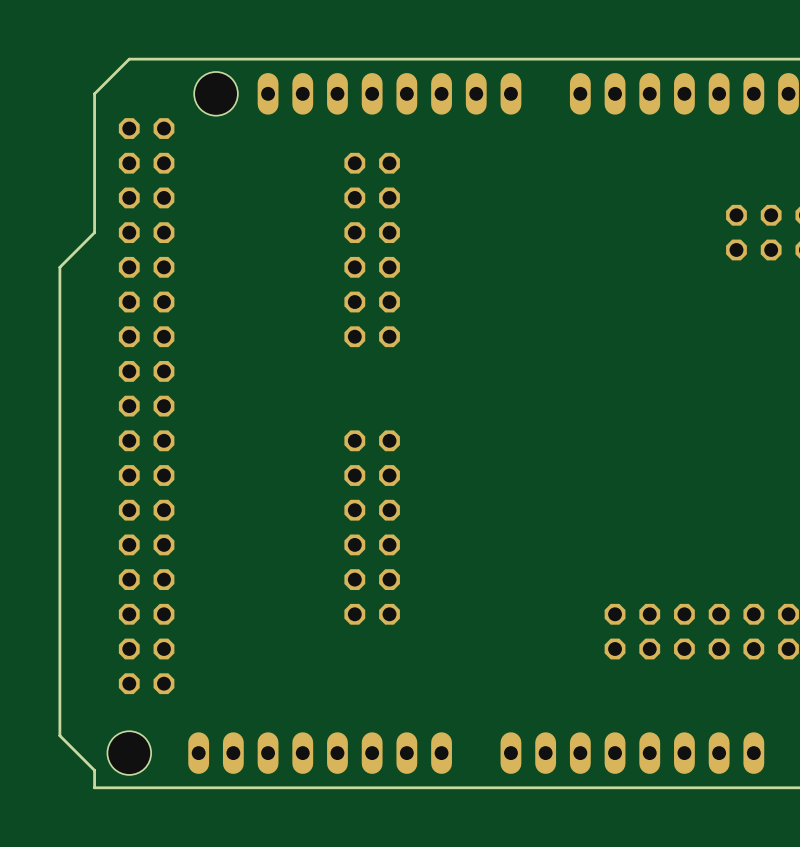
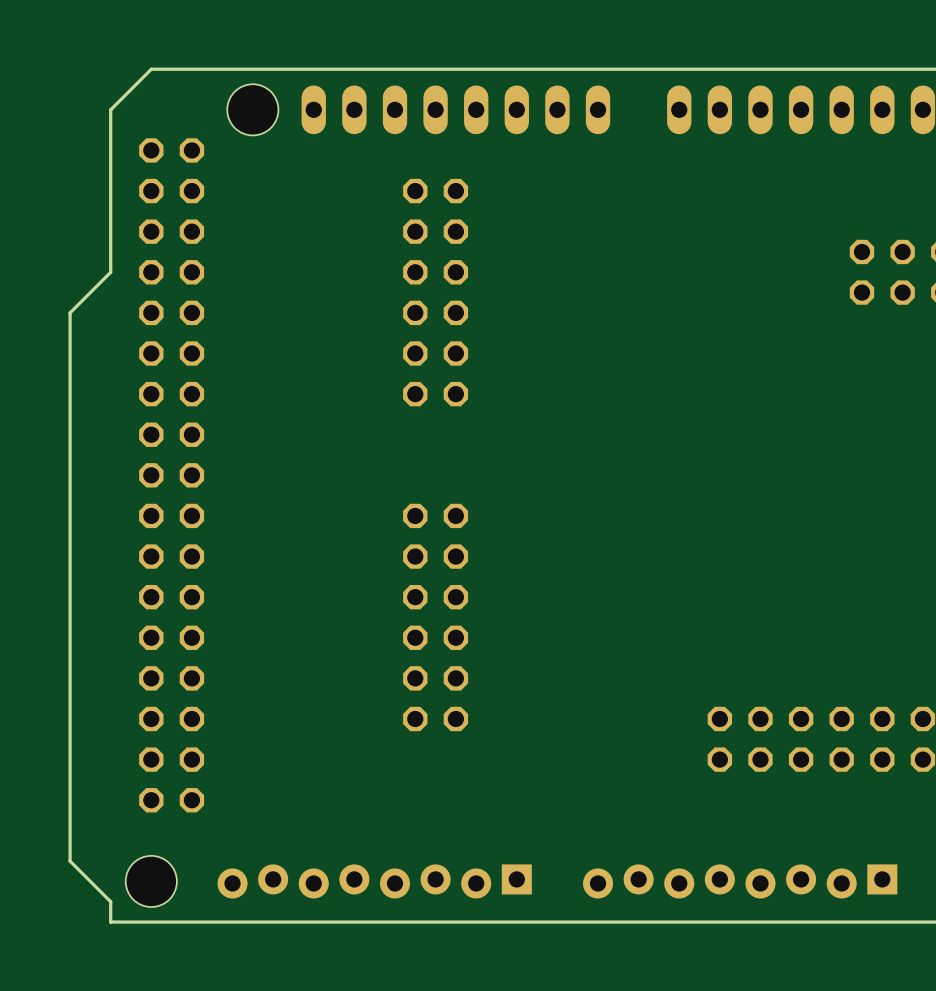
part footprint: [188, 732, 452, 774] -> [217, 864, 532, 899]
part footprint: [500, 732, 765, 774] -> [583, 864, 898, 899]

